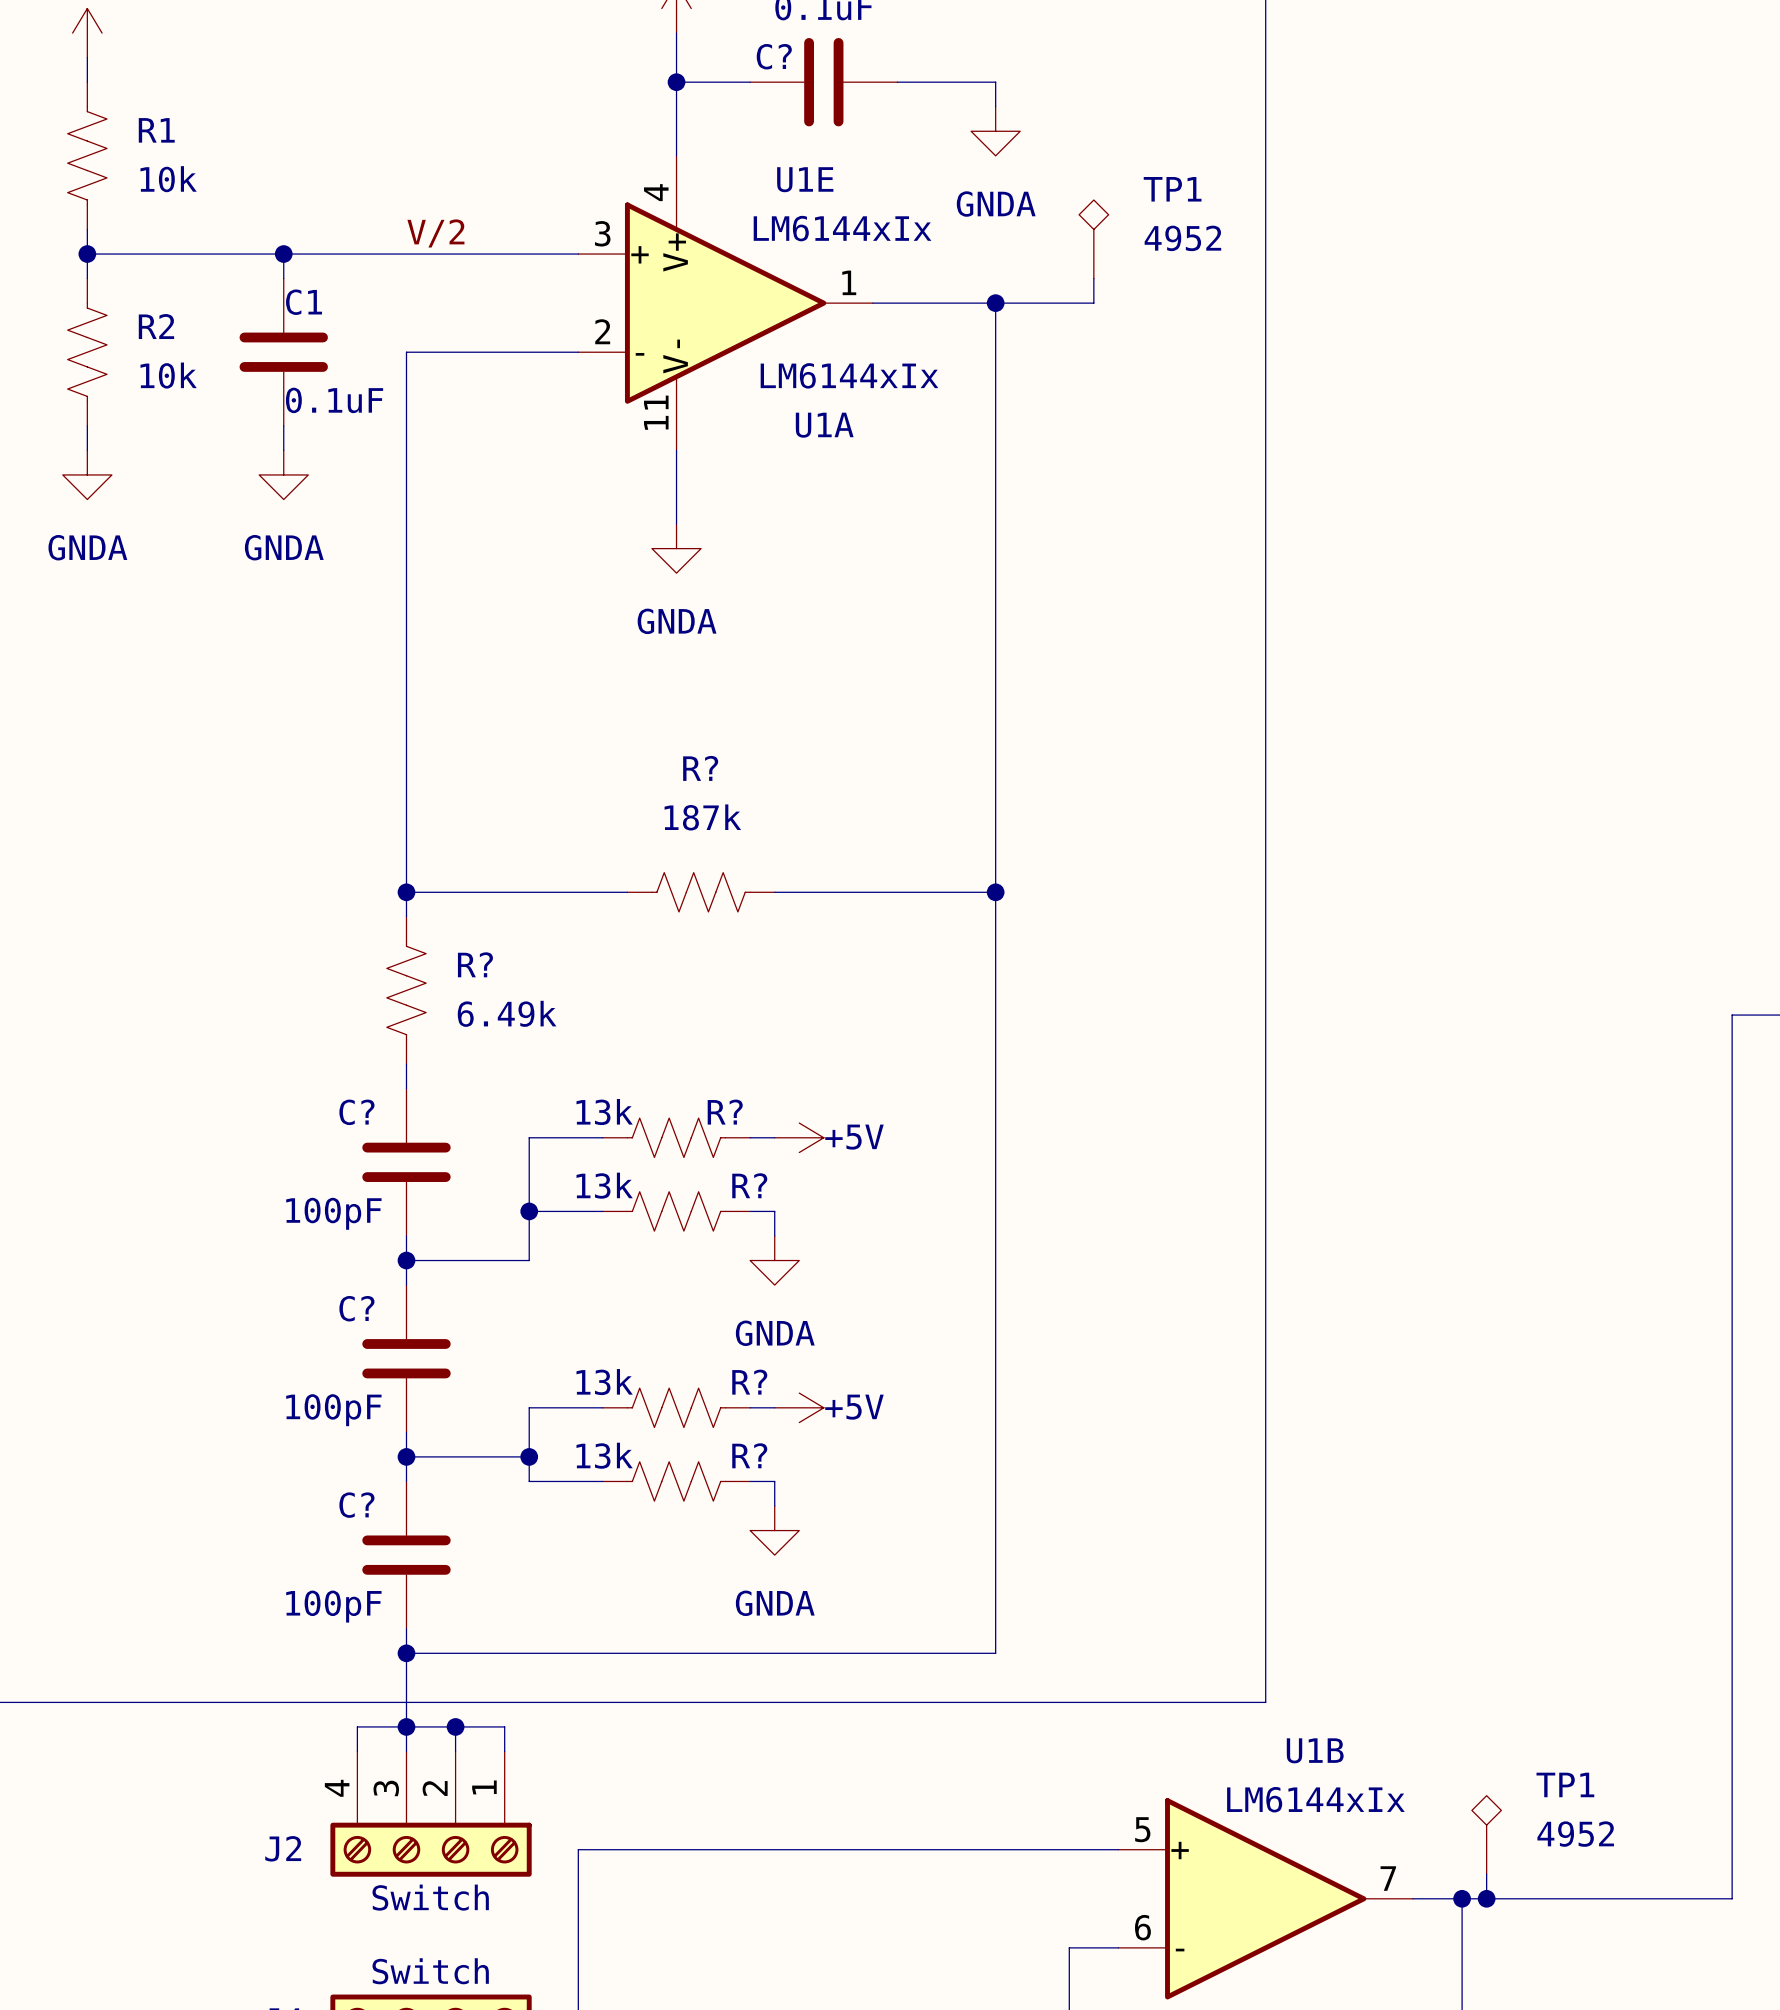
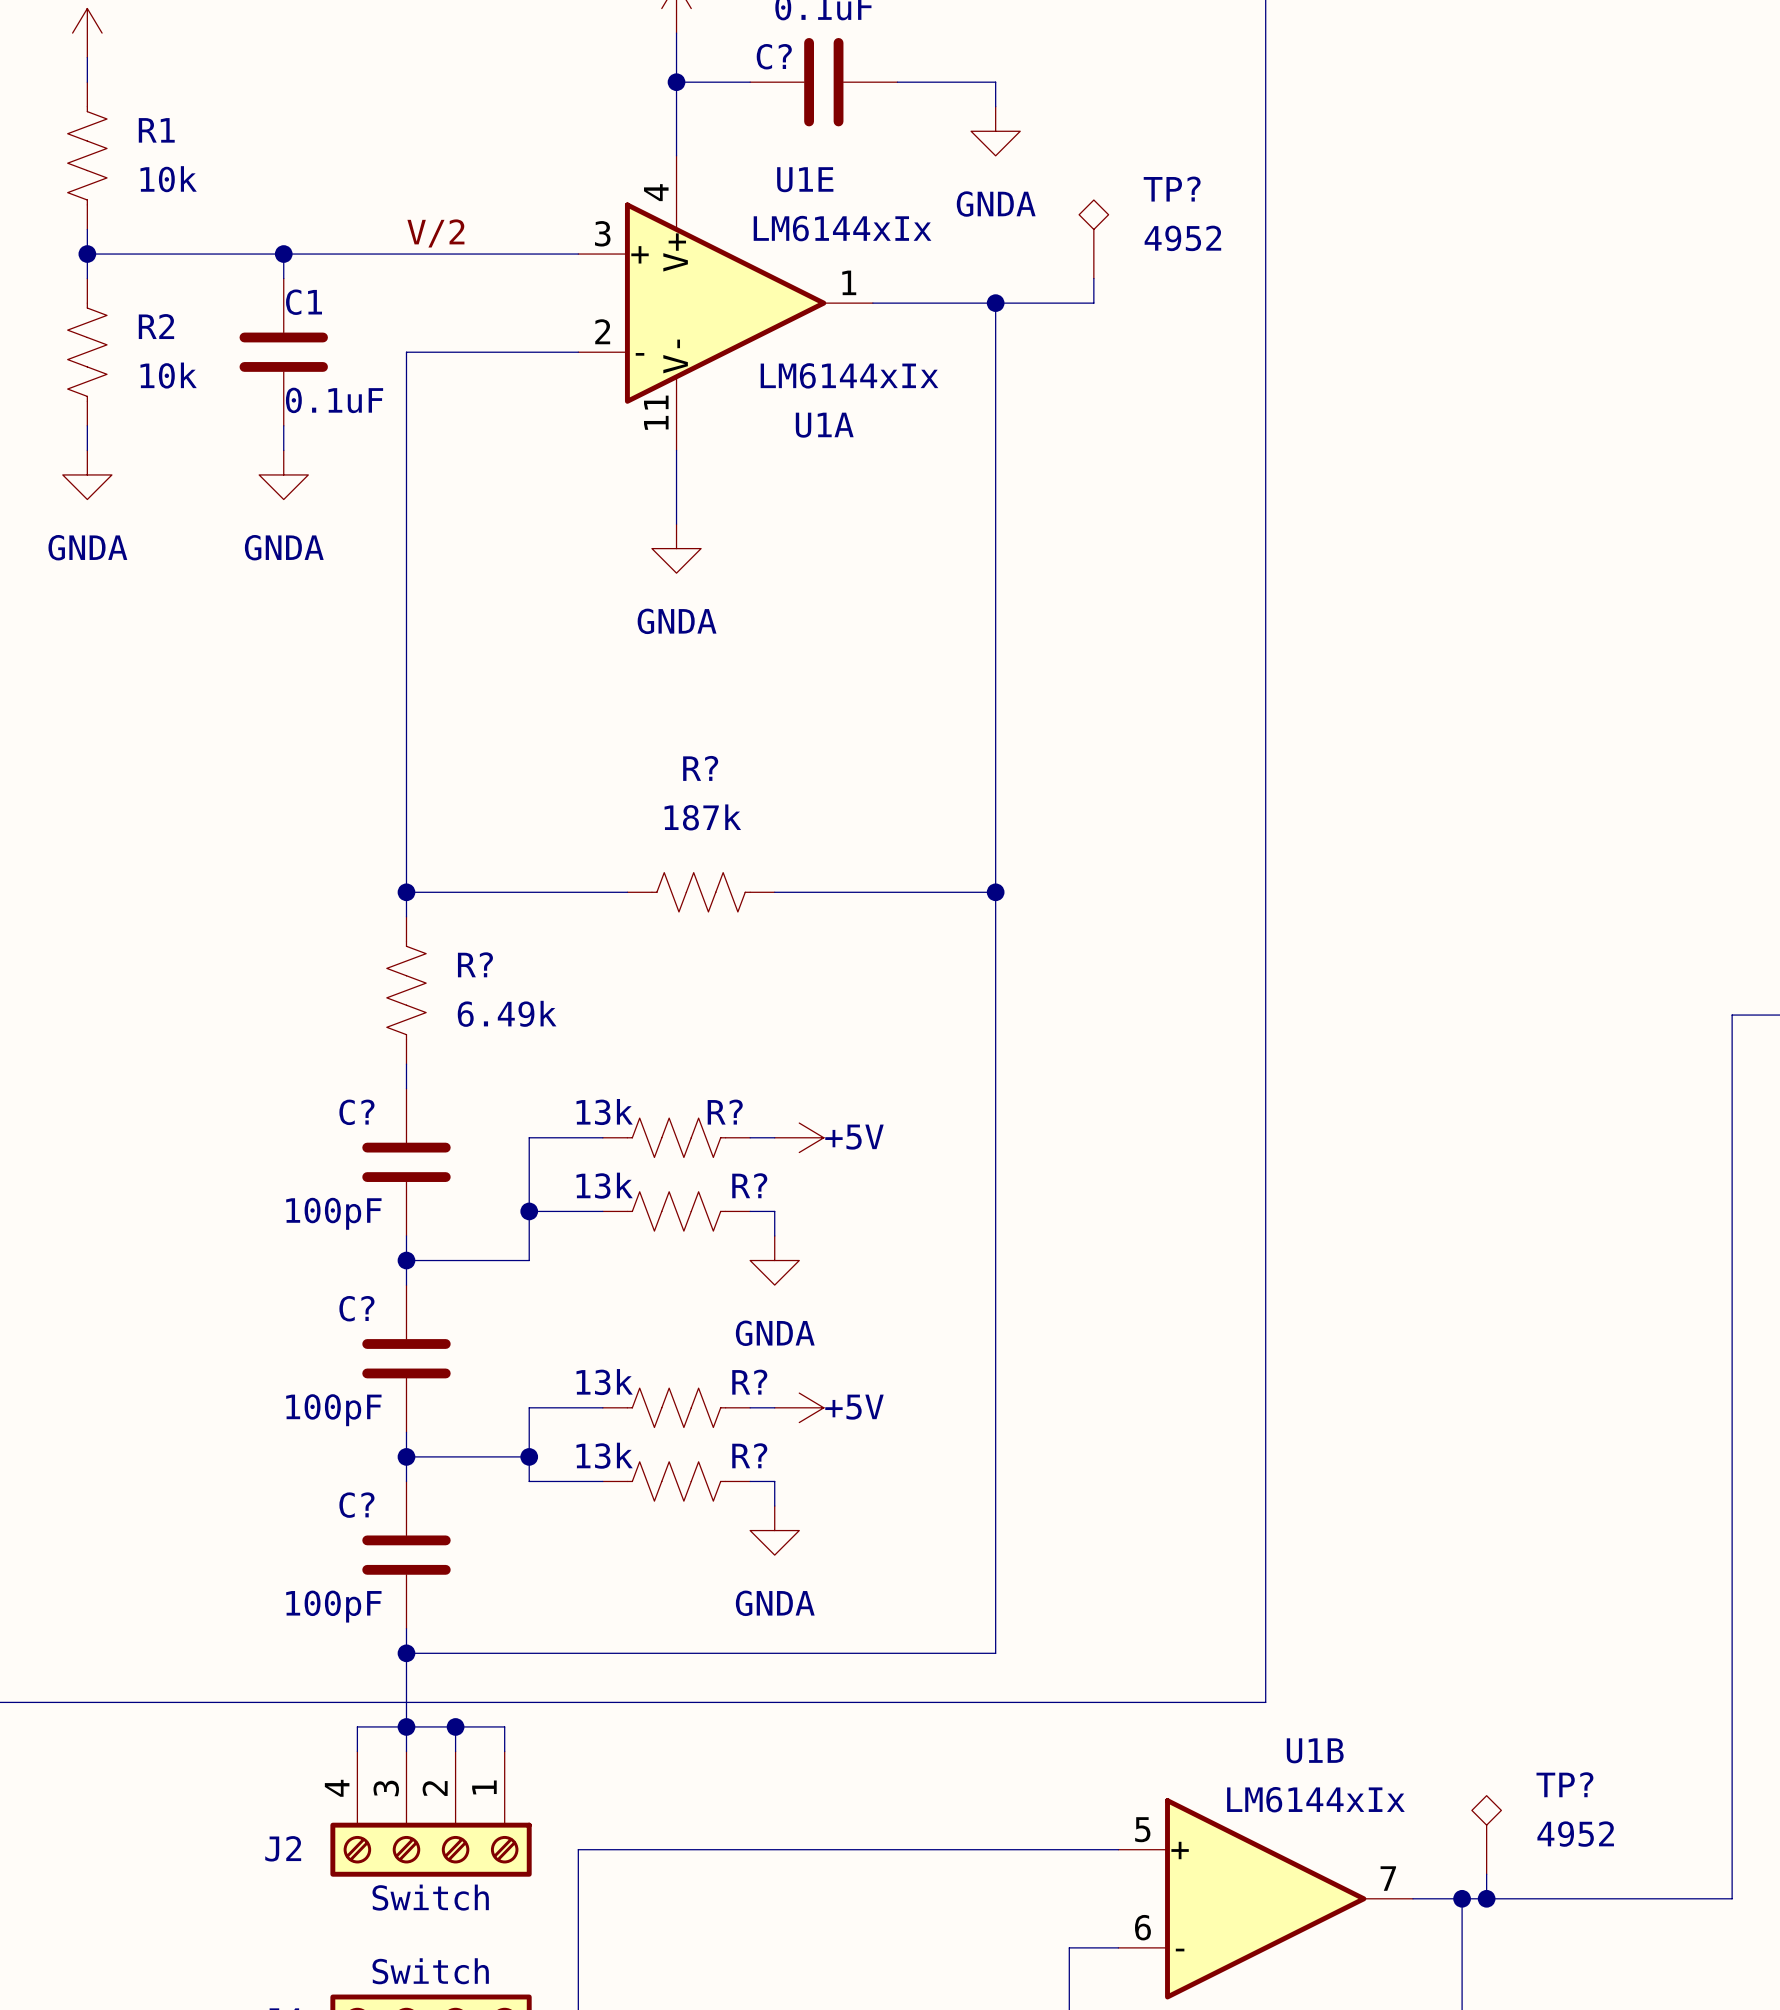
TP1 name: TP1 (1172, 189) -> TP? (1172, 189)
TP1 name: TP1 (1565, 1784) -> TP? (1564, 1784)

